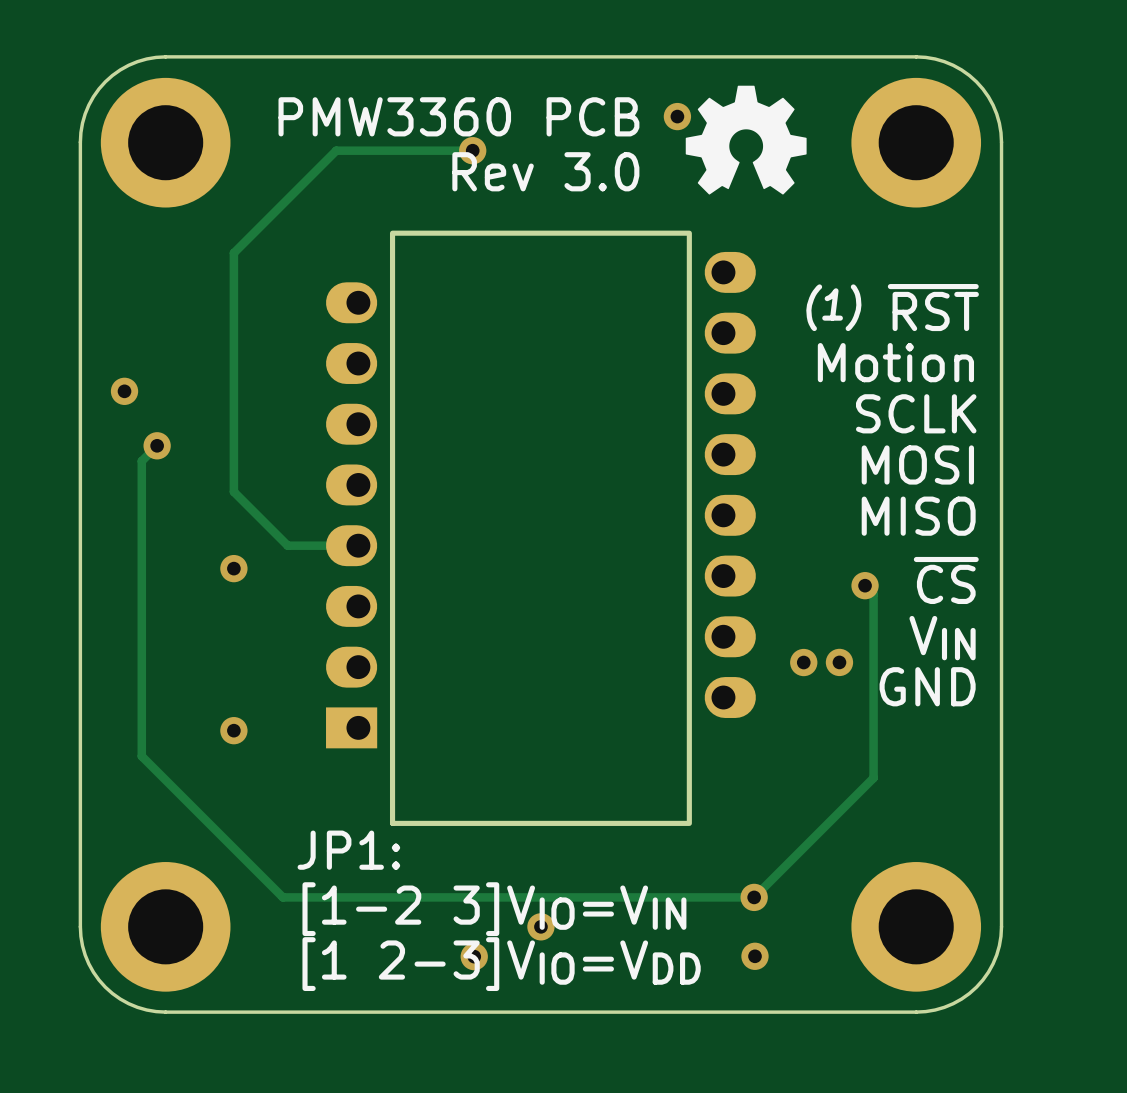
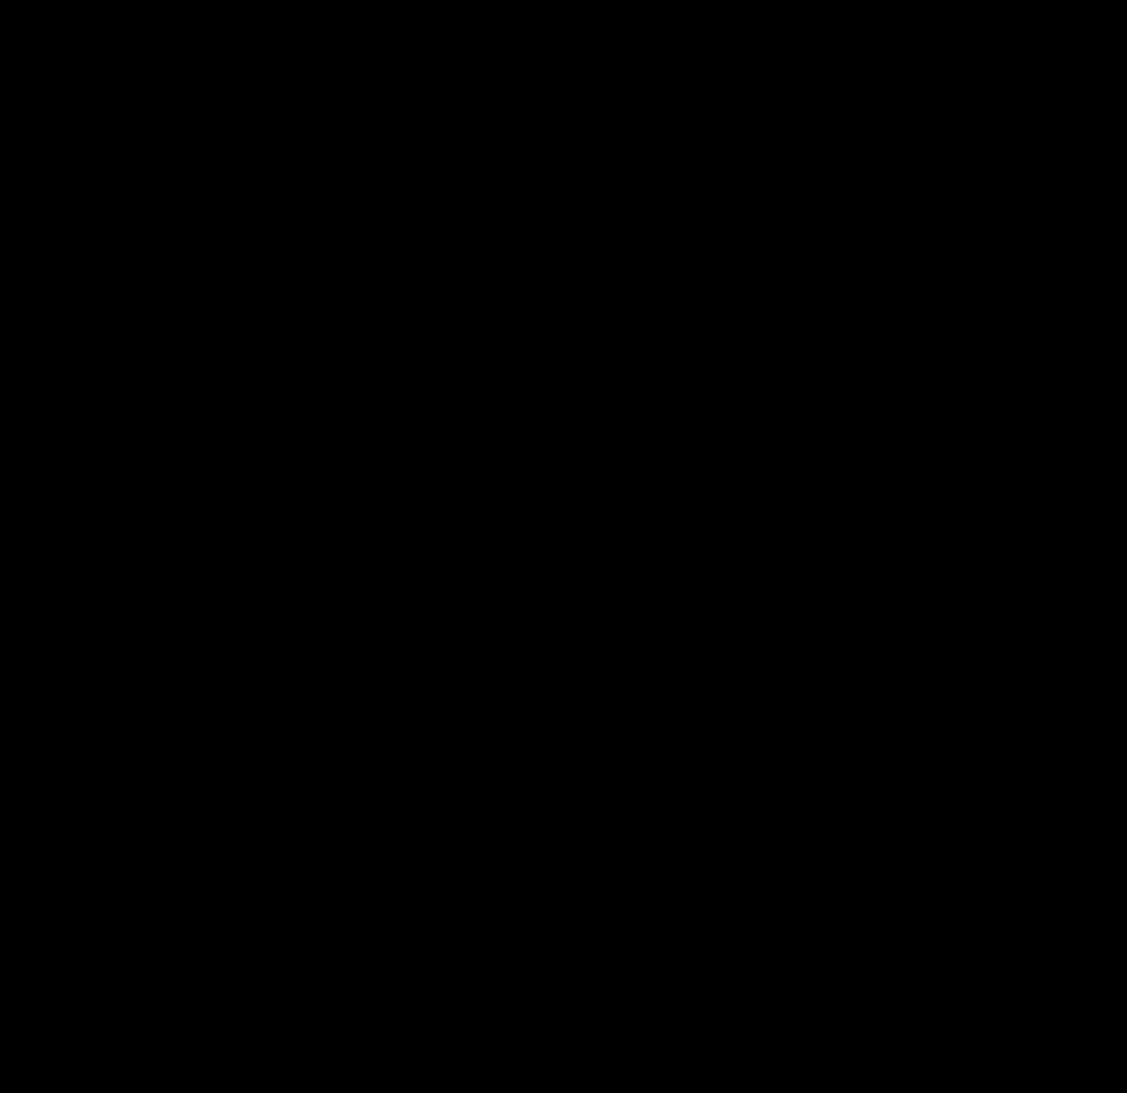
board edge: (916, 56) (165, 56) (146, 59) (128, 65) (112, 75) (98, 88) (85, 113) (80, 142) (80, 926) (82, 945) (88, 963) (98, 980) (112, 993) (137, 1007) (165, 1012) (916, 1012) (935, 1009) (953, 1003) (969, 993) (982, 980) (996, 955) (1001, 926) (1000, 132) (993, 105) (976, 81) (953, 65) (935, 59) (916, 56) -> none
drawing: [685, 85, 807, 195] -> none
text: PMW3360 PCB (458, 116) -> none
via: (677, 116) -> none
part: (165, 142) -> none
part: (916, 142) -> none
track: (472, 150) (336, 150) (233, 253) (233, 491) (287, 545) (358, 545) -> none
via: (472, 150) -> none
text: Rev 3.0 (545, 171) -> none
text: (1) (833, 307) -> none
text: ~{RST} (933, 307) -> none
text: Motion (895, 362) -> none
via: (124, 391) -> none
text: SCLK (916, 413) -> none
track: (157, 445) (141, 461) (141, 756) (282, 897) (754, 897) (873, 778) (873, 594) (865, 585) -> none
via: (157, 445) -> none
text: MOSI (917, 464) -> none
text: MISO (918, 516) -> none
part: (540, 528) -> none
via: (233, 568) -> none
text: ~{CS} (946, 580) -> none
via: (865, 585) -> none
text: VIN (942, 638) -> none
via: (803, 662) -> none
via: (839, 662) -> none
text: GND (927, 686) -> none
via: (233, 730) -> none
text: JP1: (348, 850) -> none
via: (754, 897) -> none
text: [1-2 3]VIO=VIN (494, 909) -> none
part: (165, 926) -> none
via: (540, 926) -> none
part: (916, 926) -> none
via: (474, 956) -> none
via: (755, 956) -> none
text: [1 2-3]VIO=VDD (501, 964) -> none

